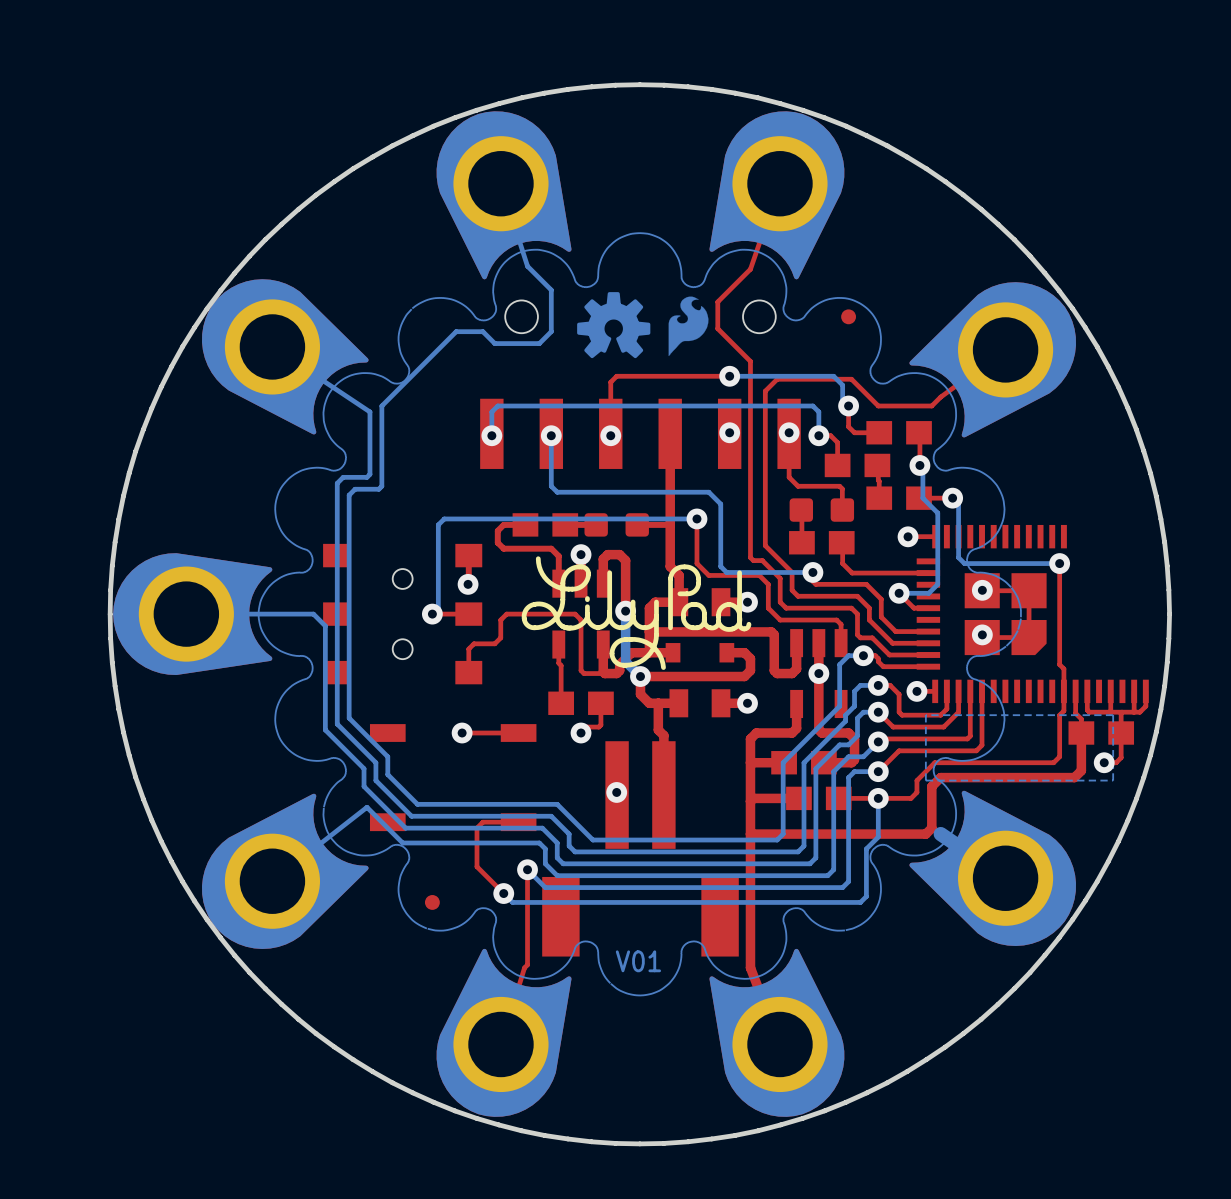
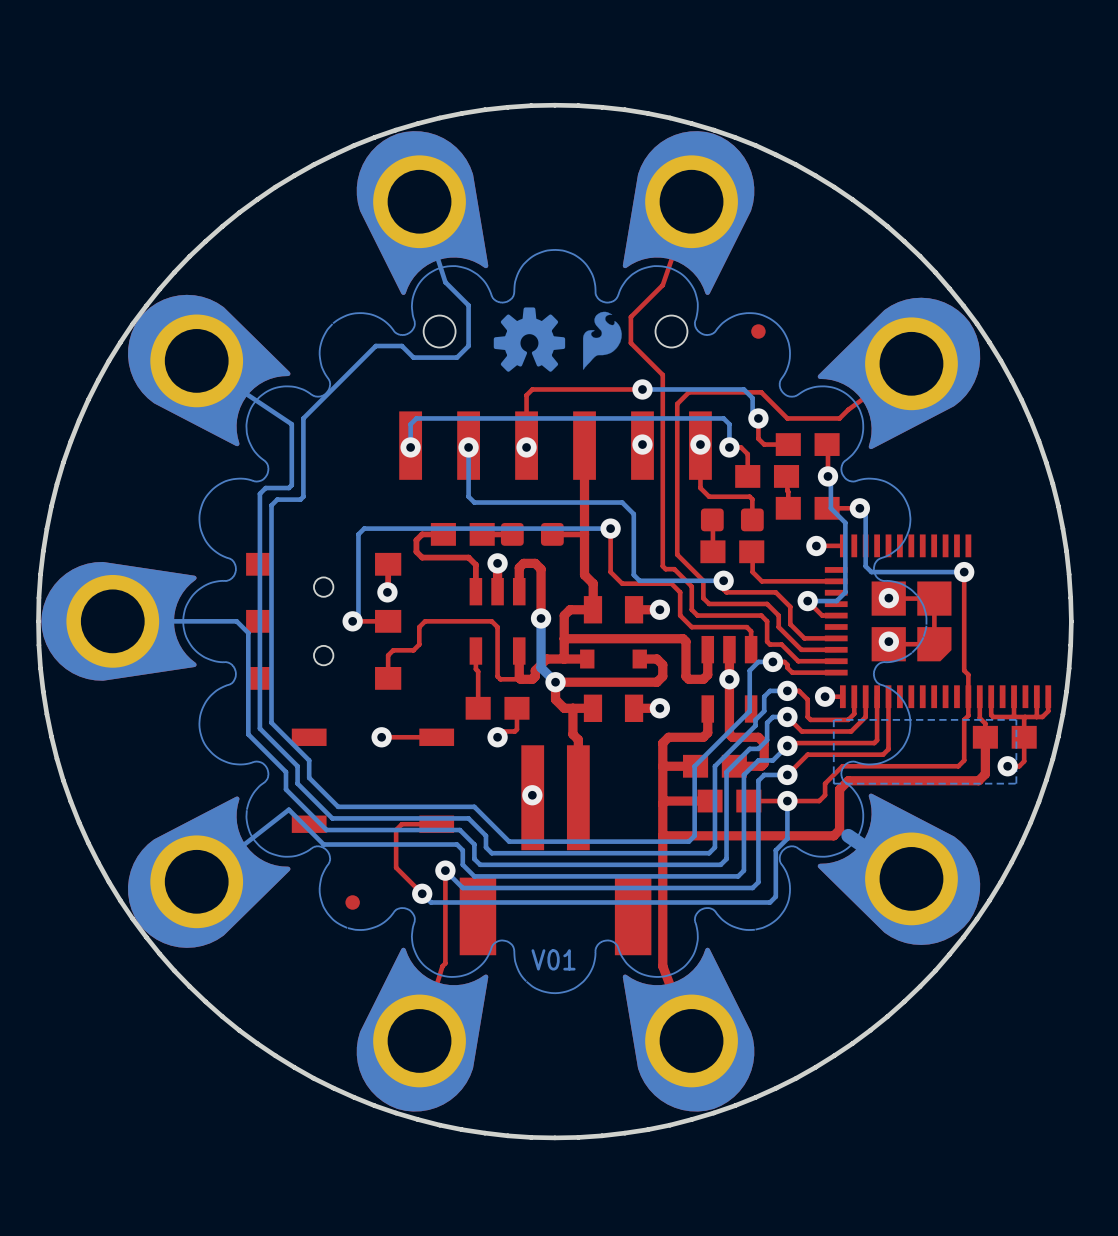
drawing: [521, 556, 752, 670] -> none

